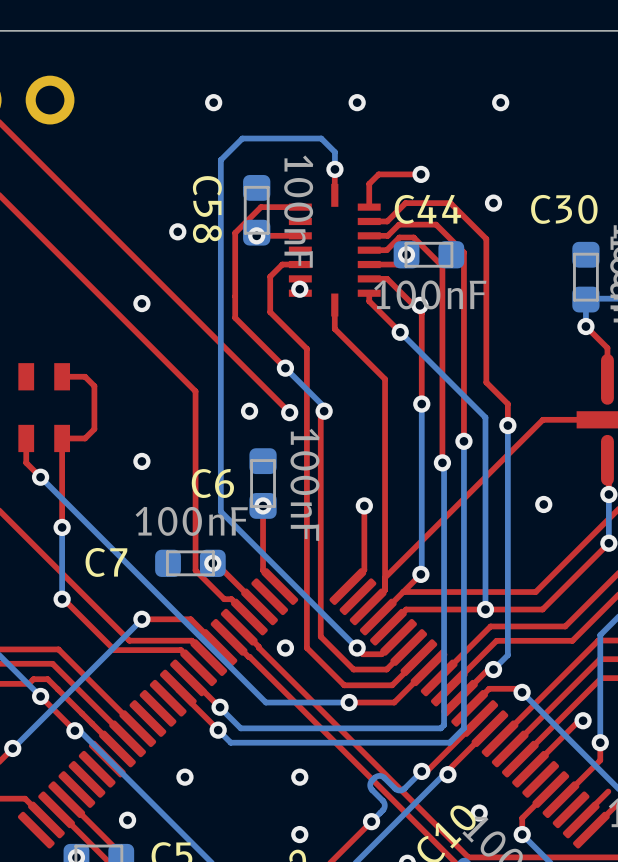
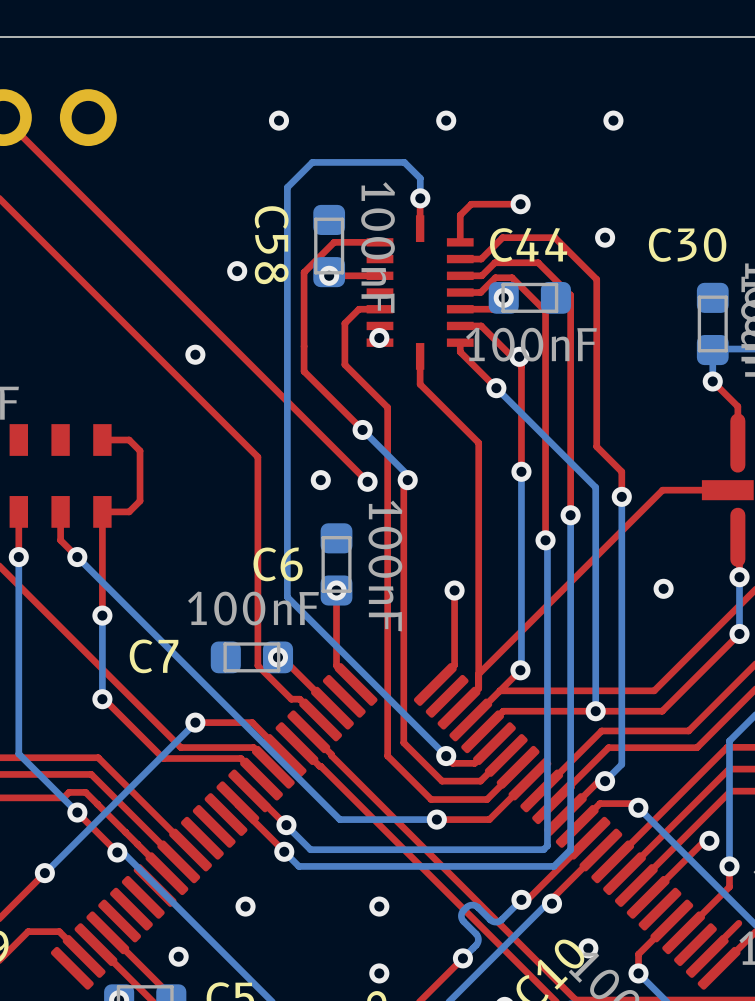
via: (141, 461) -> none
via: (285, 648) -> none

